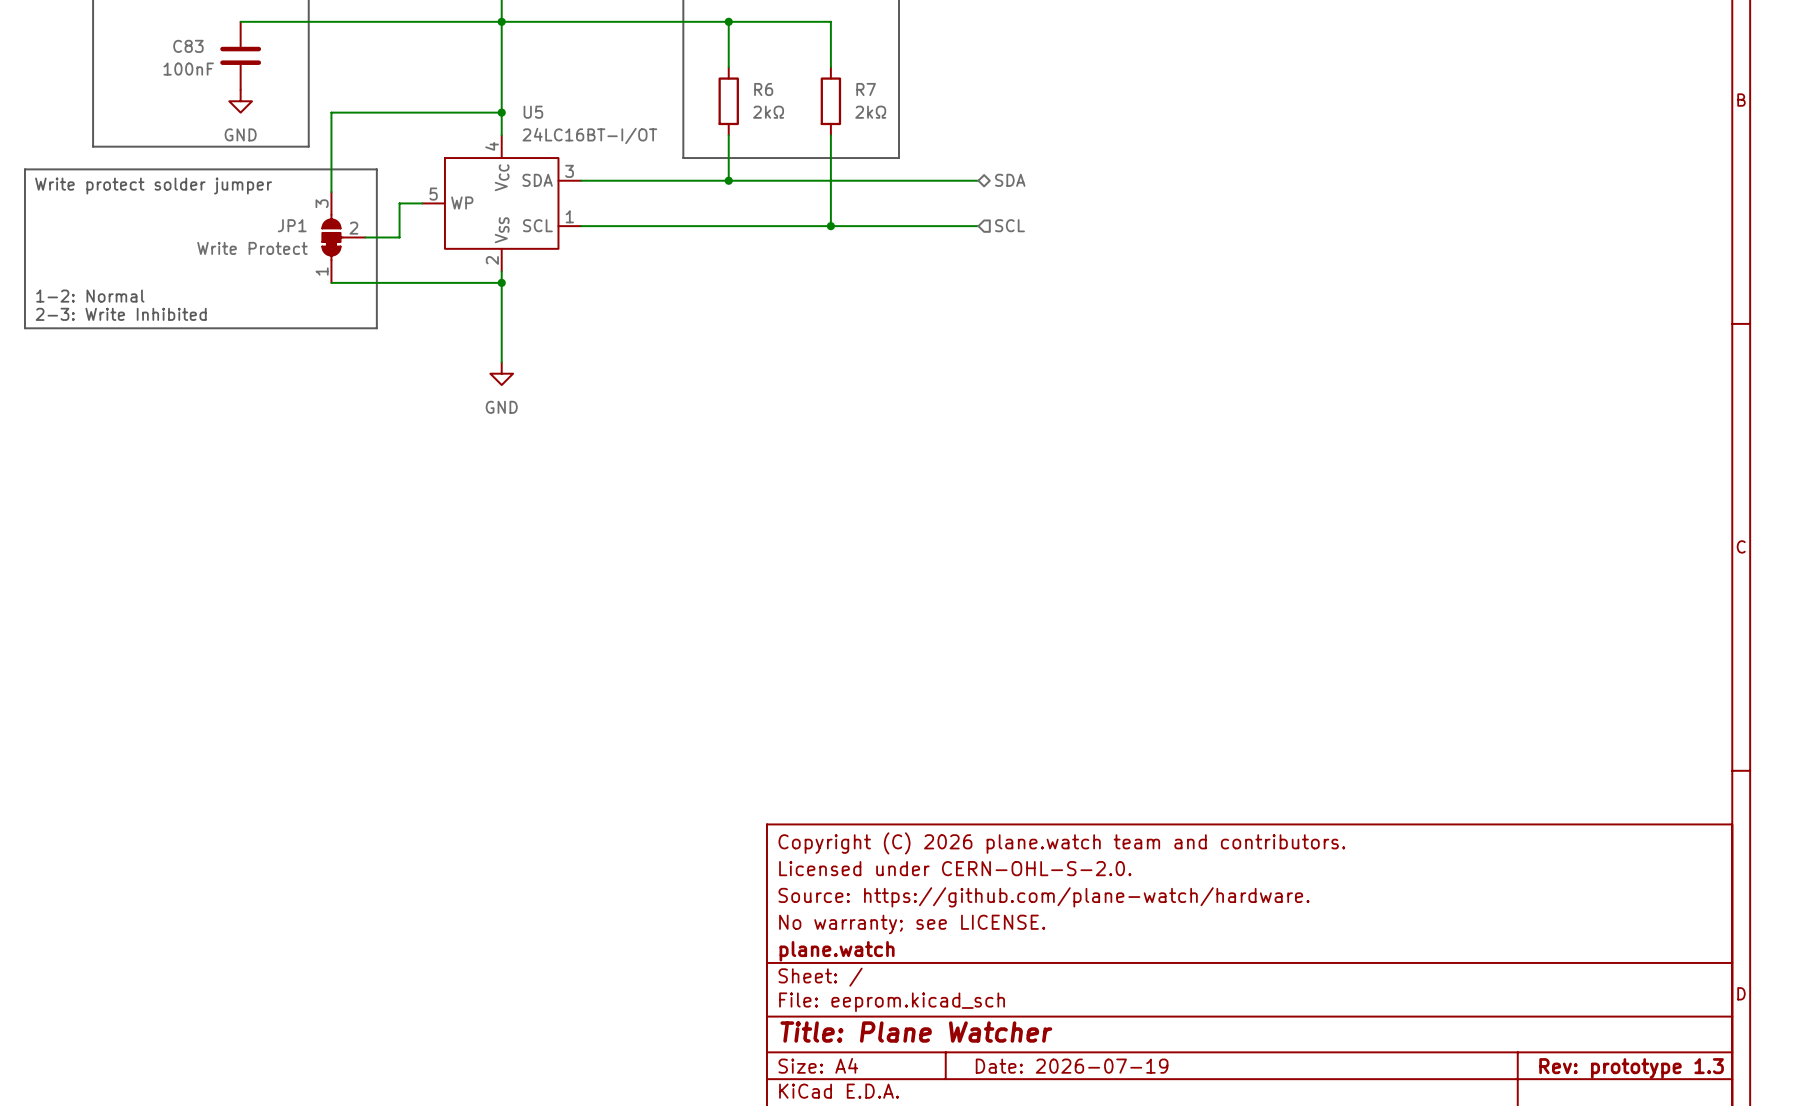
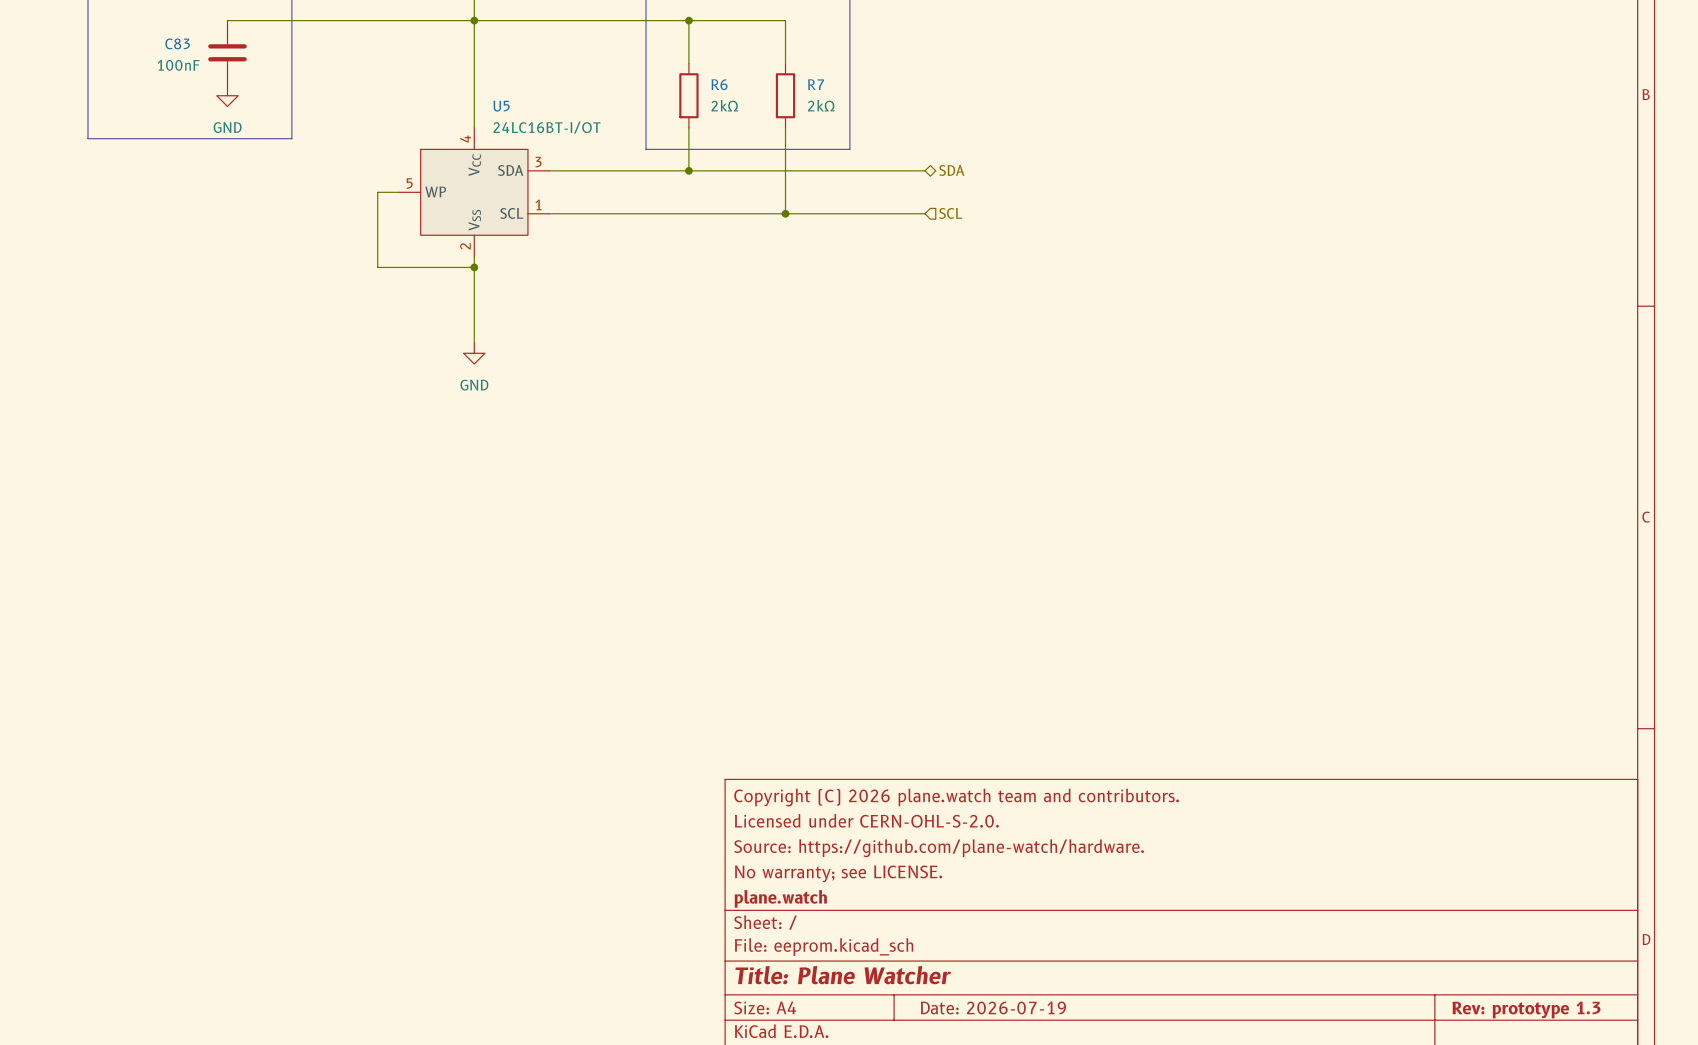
wire: (501, 112) (331, 112) (331, 192) -> none
junction: (501, 112) -> none
line: (24, 169) (376, 169) (376, 328) (24, 328) (24, 169) -> none
text: Write protect solder jumper (153, 186) -> none
JP1: Write Protect (343, 237) -> none
wire: (365, 237) (399, 237) -> (377, 267) (377, 224)
wire: (331, 282) (399, 282) -> none
text: 1-2: Normal (90, 296) -> none
text: 2-3: Write Inhibited (121, 314) -> none

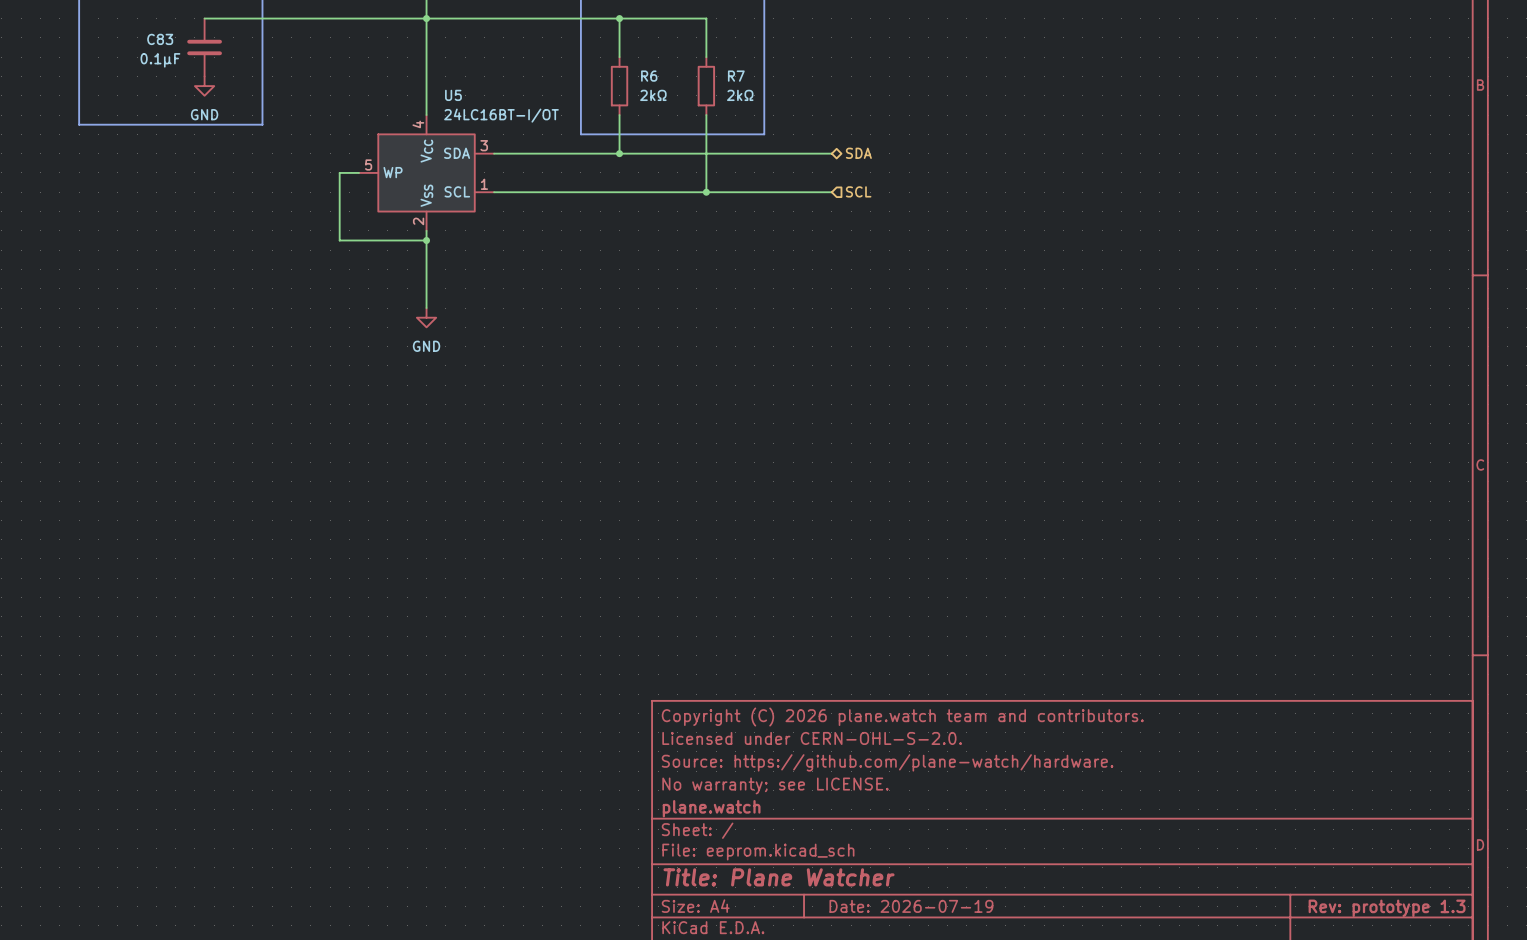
C83 value: 100nF (178, 65) -> 0.1µF (160, 60)

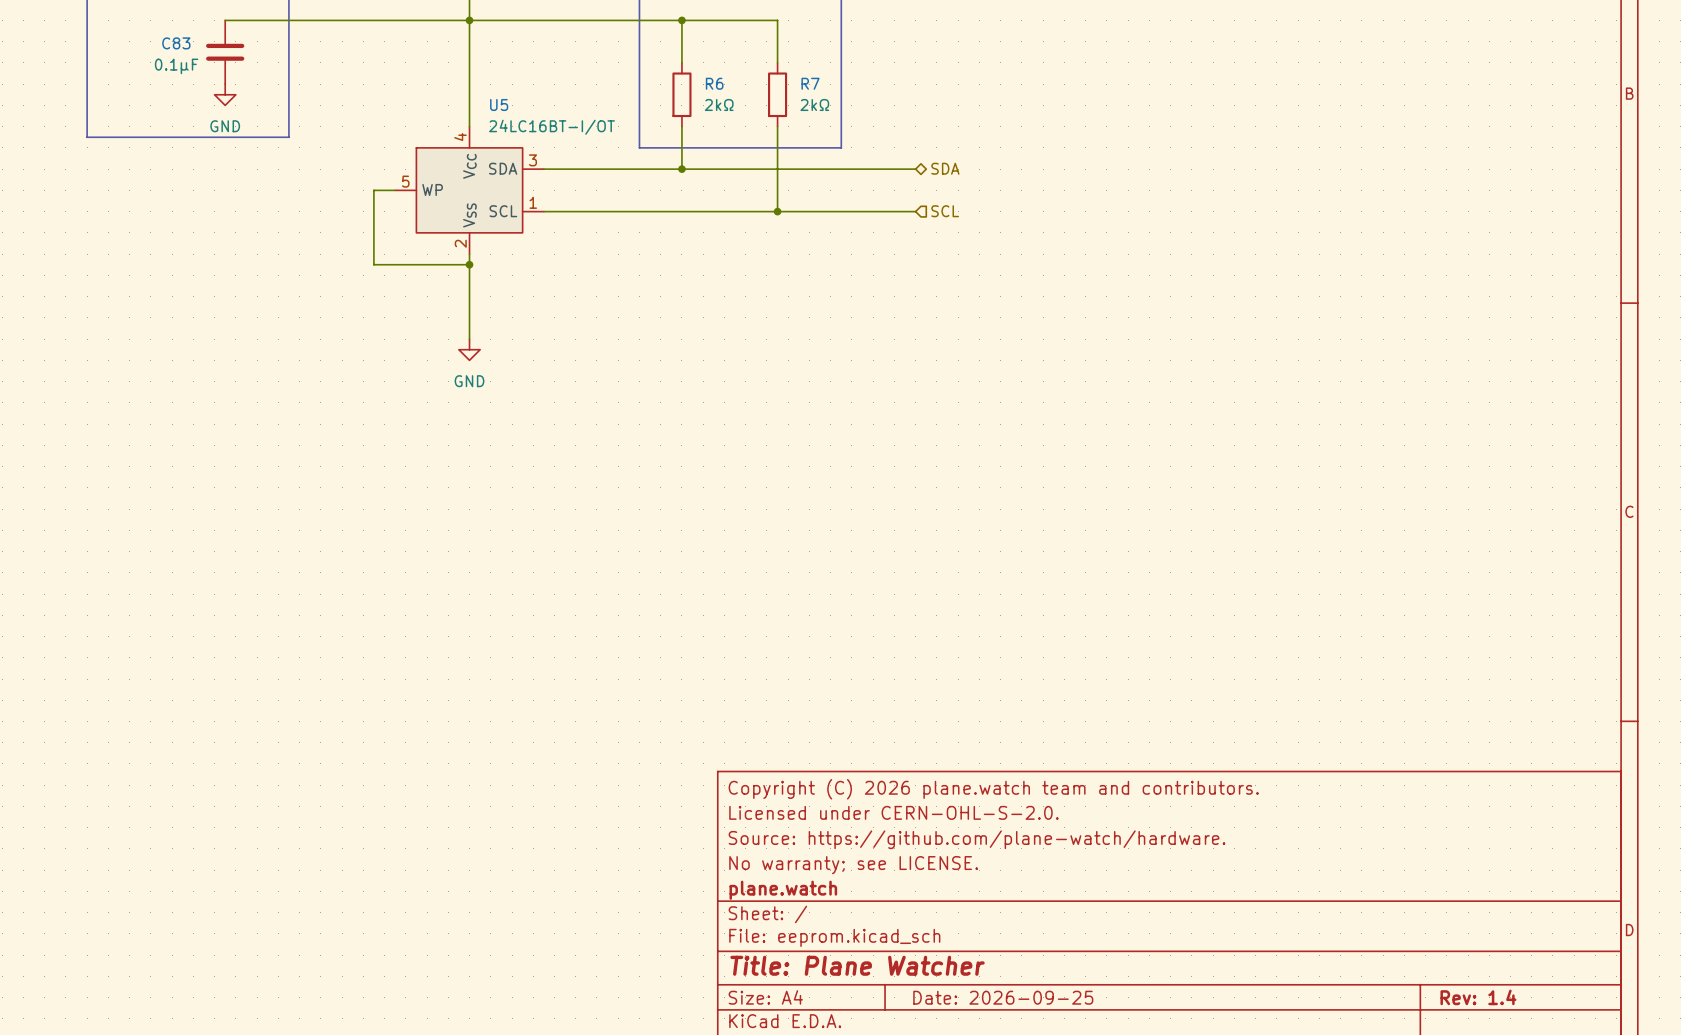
title block: Date: 2026-07-19 (911, 906) -> Date: 2026-09-25 (1003, 997)
title block: Rev: prototype 1.3 (1387, 908) -> Rev: 1.4 (1478, 997)

